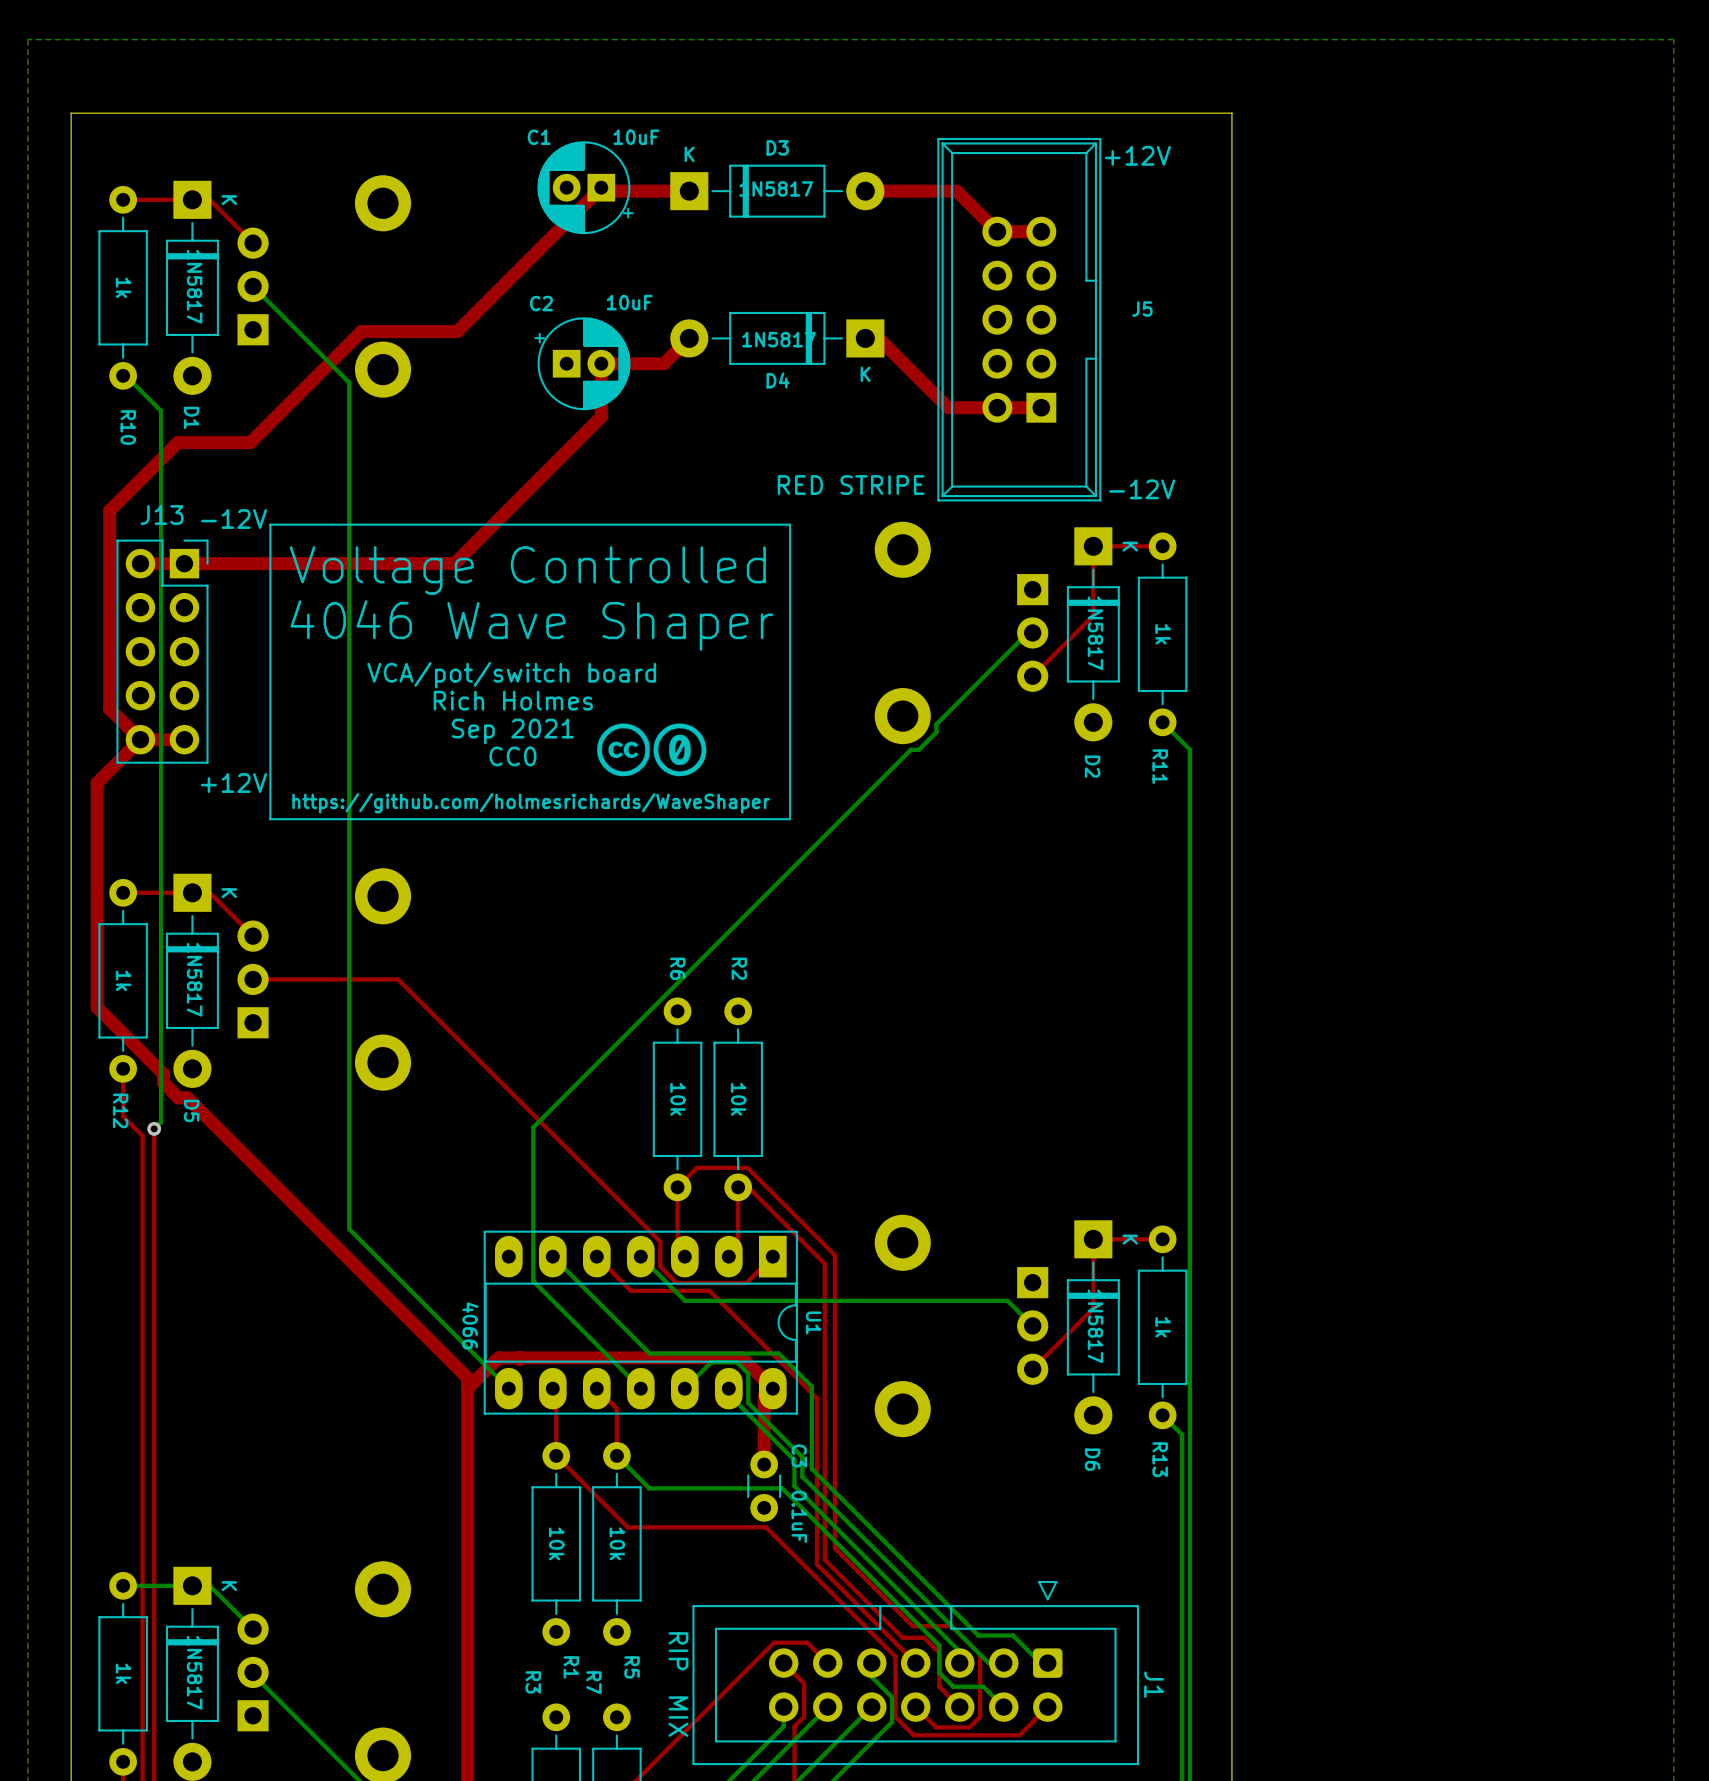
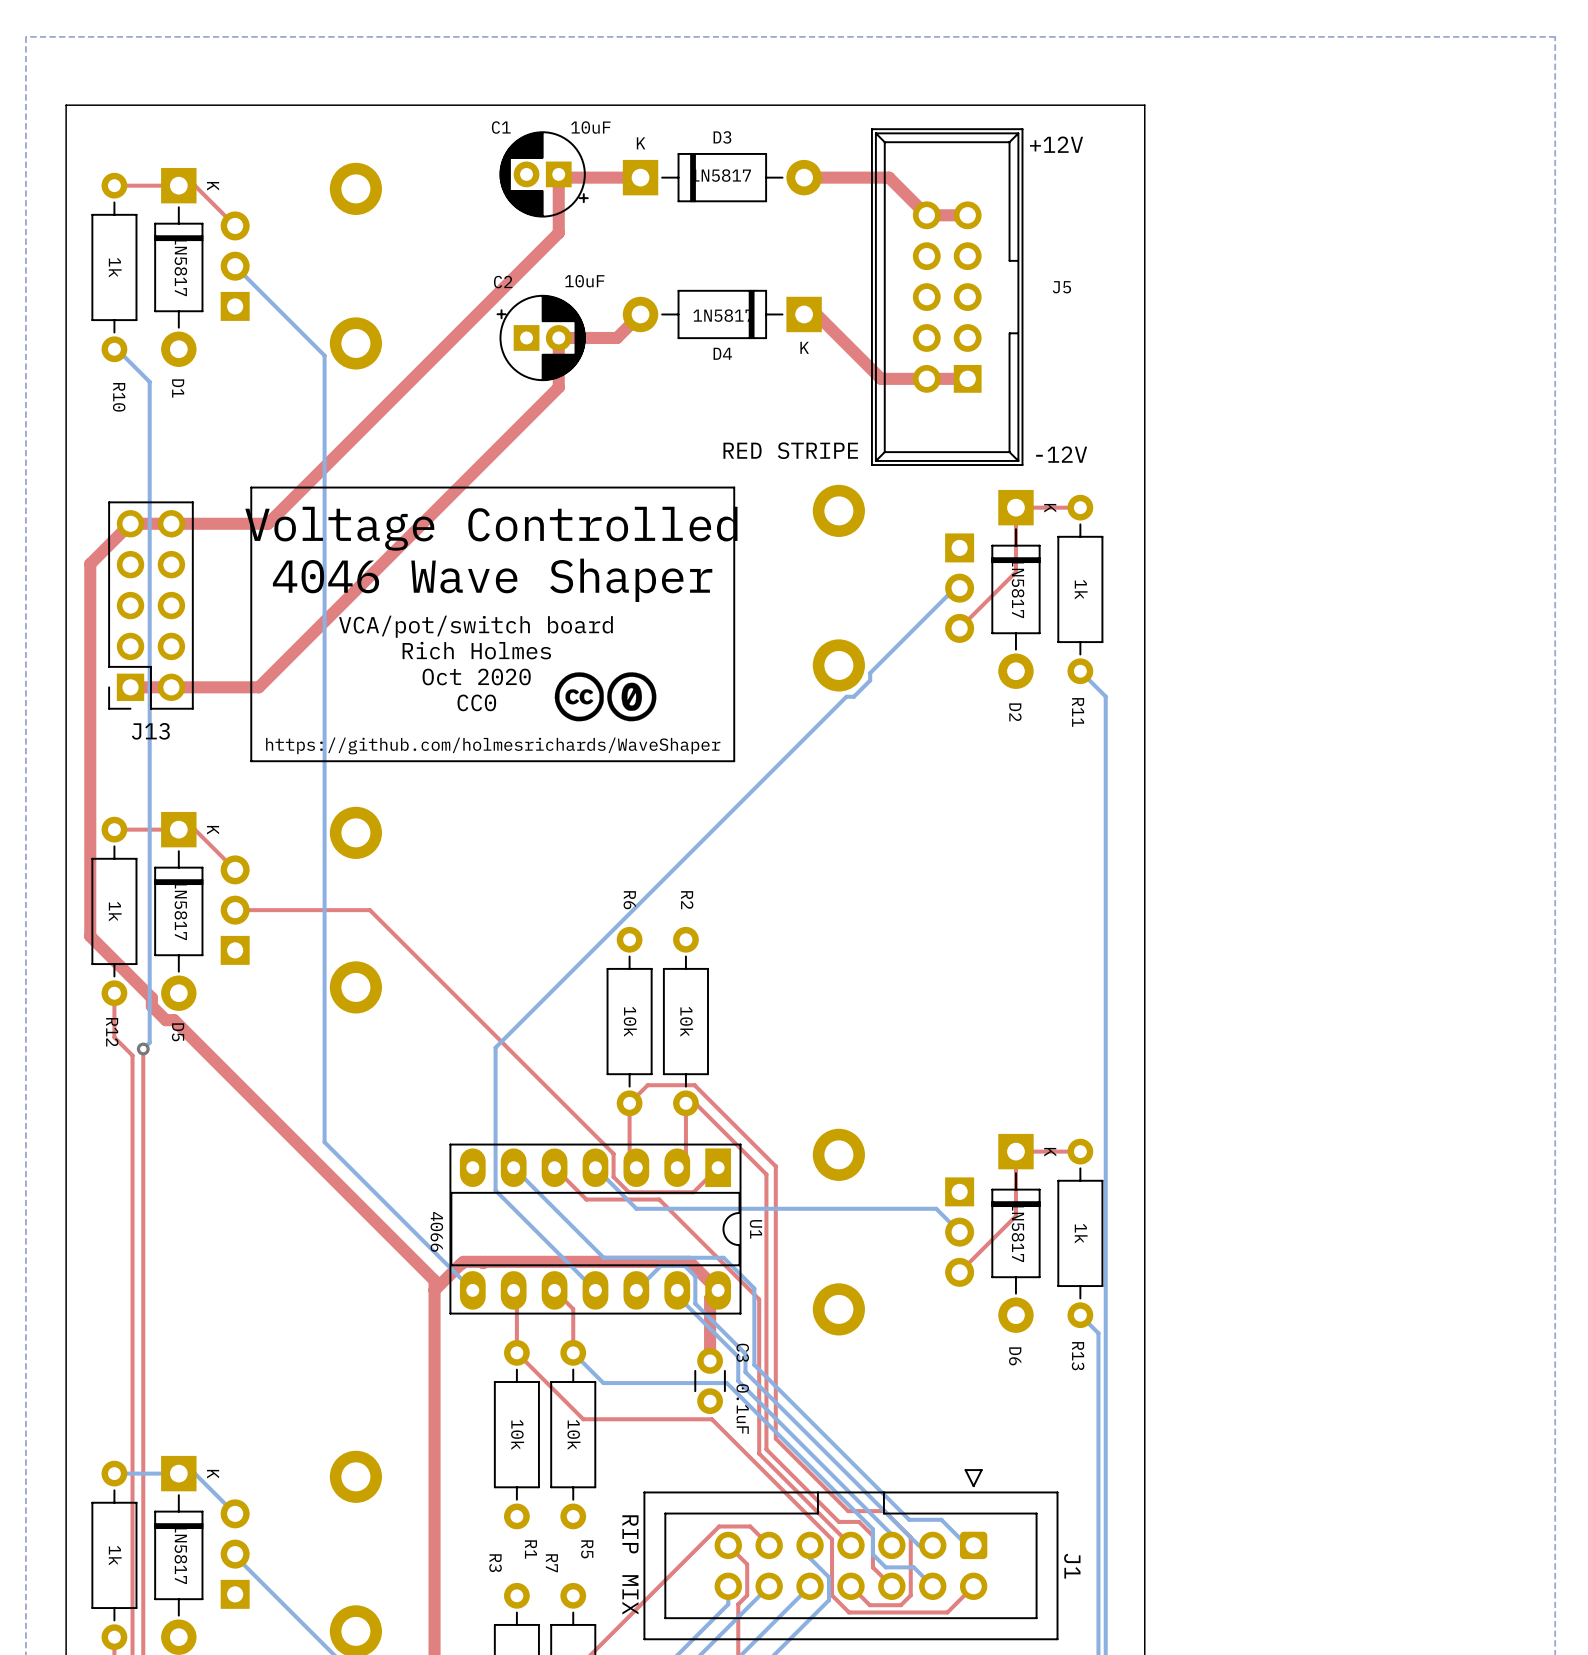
top track: (601, 187) (457, 331) (361, 331) (250, 442) (177, 442) (109, 510) (109, 708) (140, 739) (97, 782) -> (558, 174) (558, 232) (267, 523)
text: -12V (234, 518) -> none
top track: none -> (130, 523) (90, 564) (90, 727)
top track: (454, 563) (288, 563) -> (422, 523) (258, 687) (171, 687)
J13 rotation: 0° (162, 651) -> 180° (150, 605)
text: Sep 2021 (512, 731) -> Oct 2020 (476, 676)
text: +12V (234, 783) -> none

